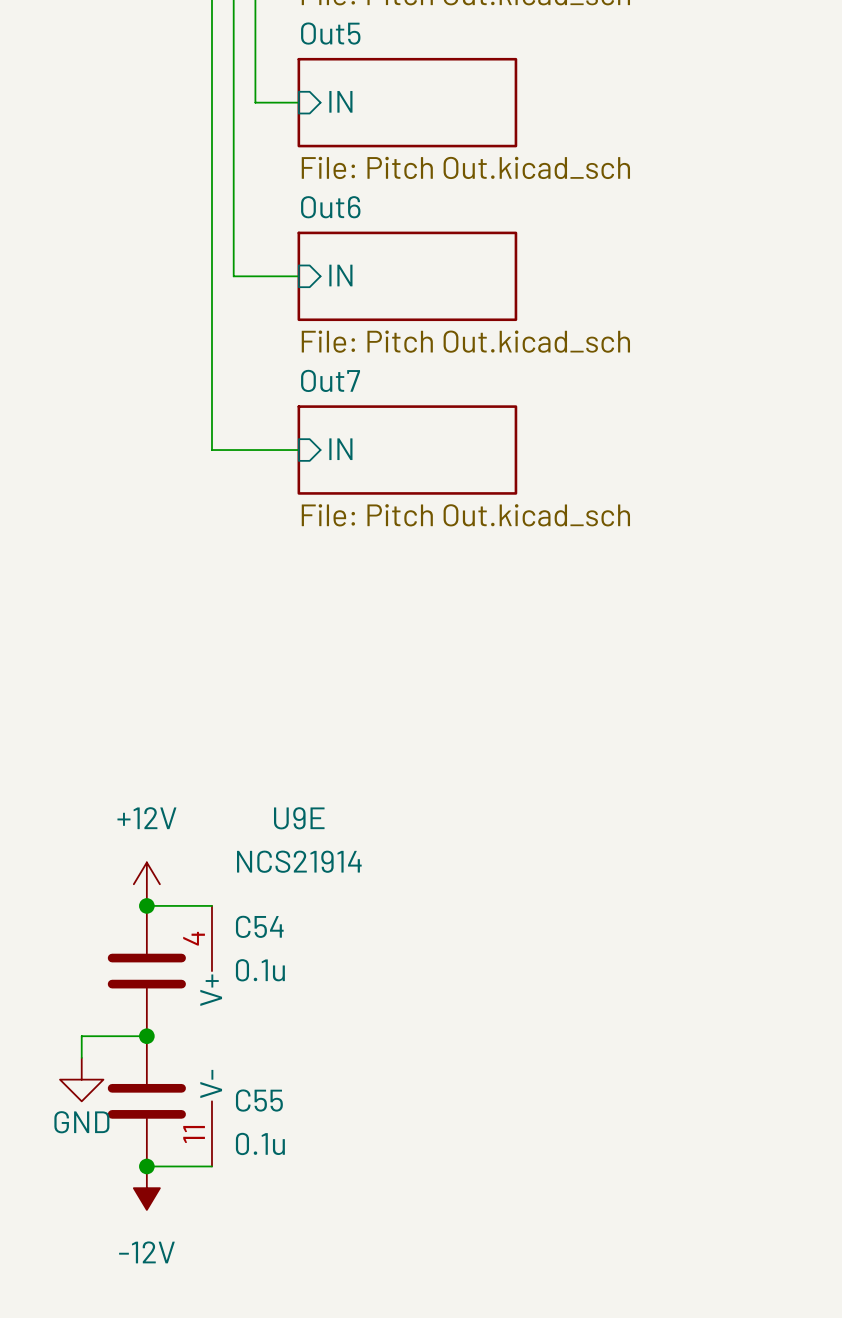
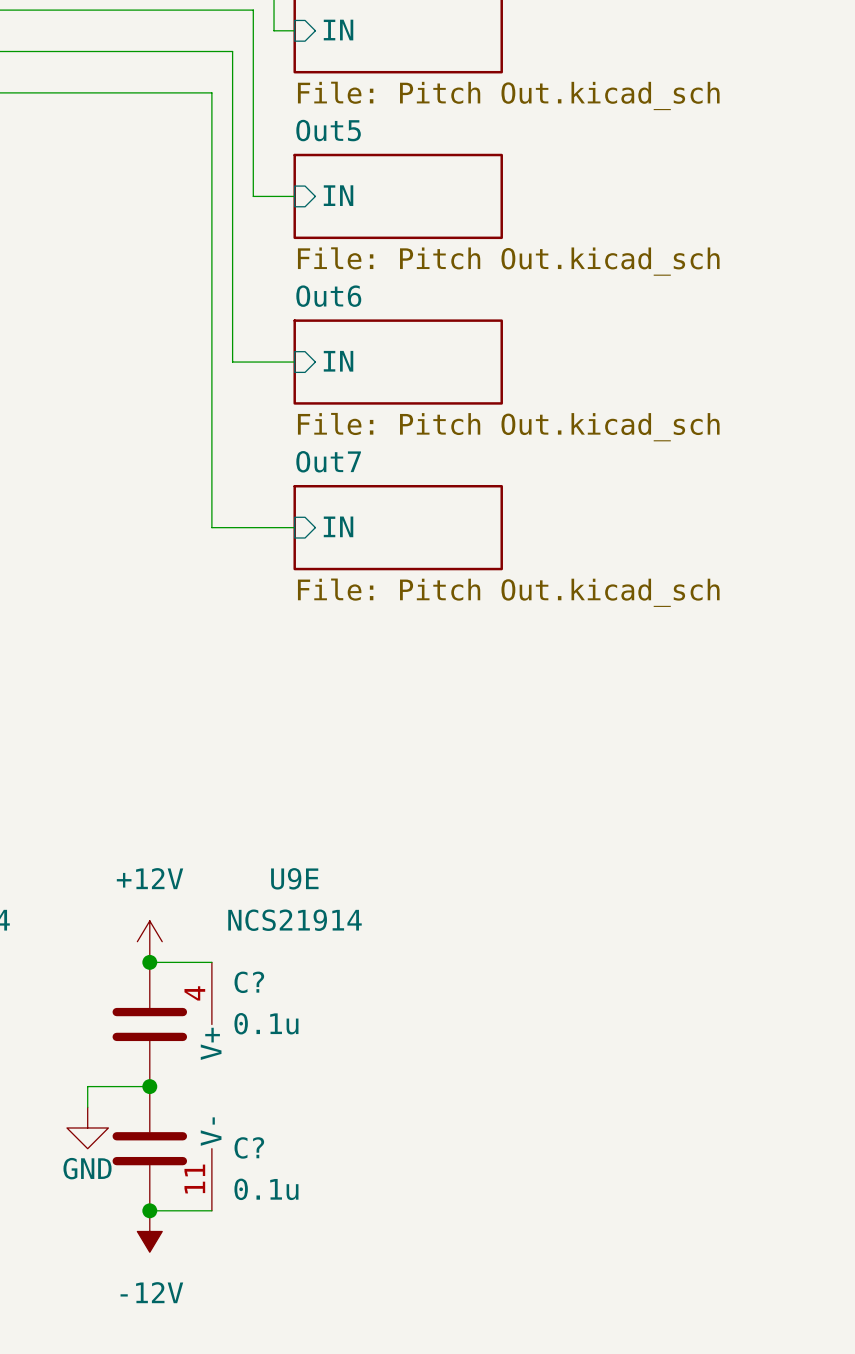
C54 name: C54 (259, 926) -> C? (249, 982)
C55 name: C55 (259, 1100) -> C? (249, 1147)

